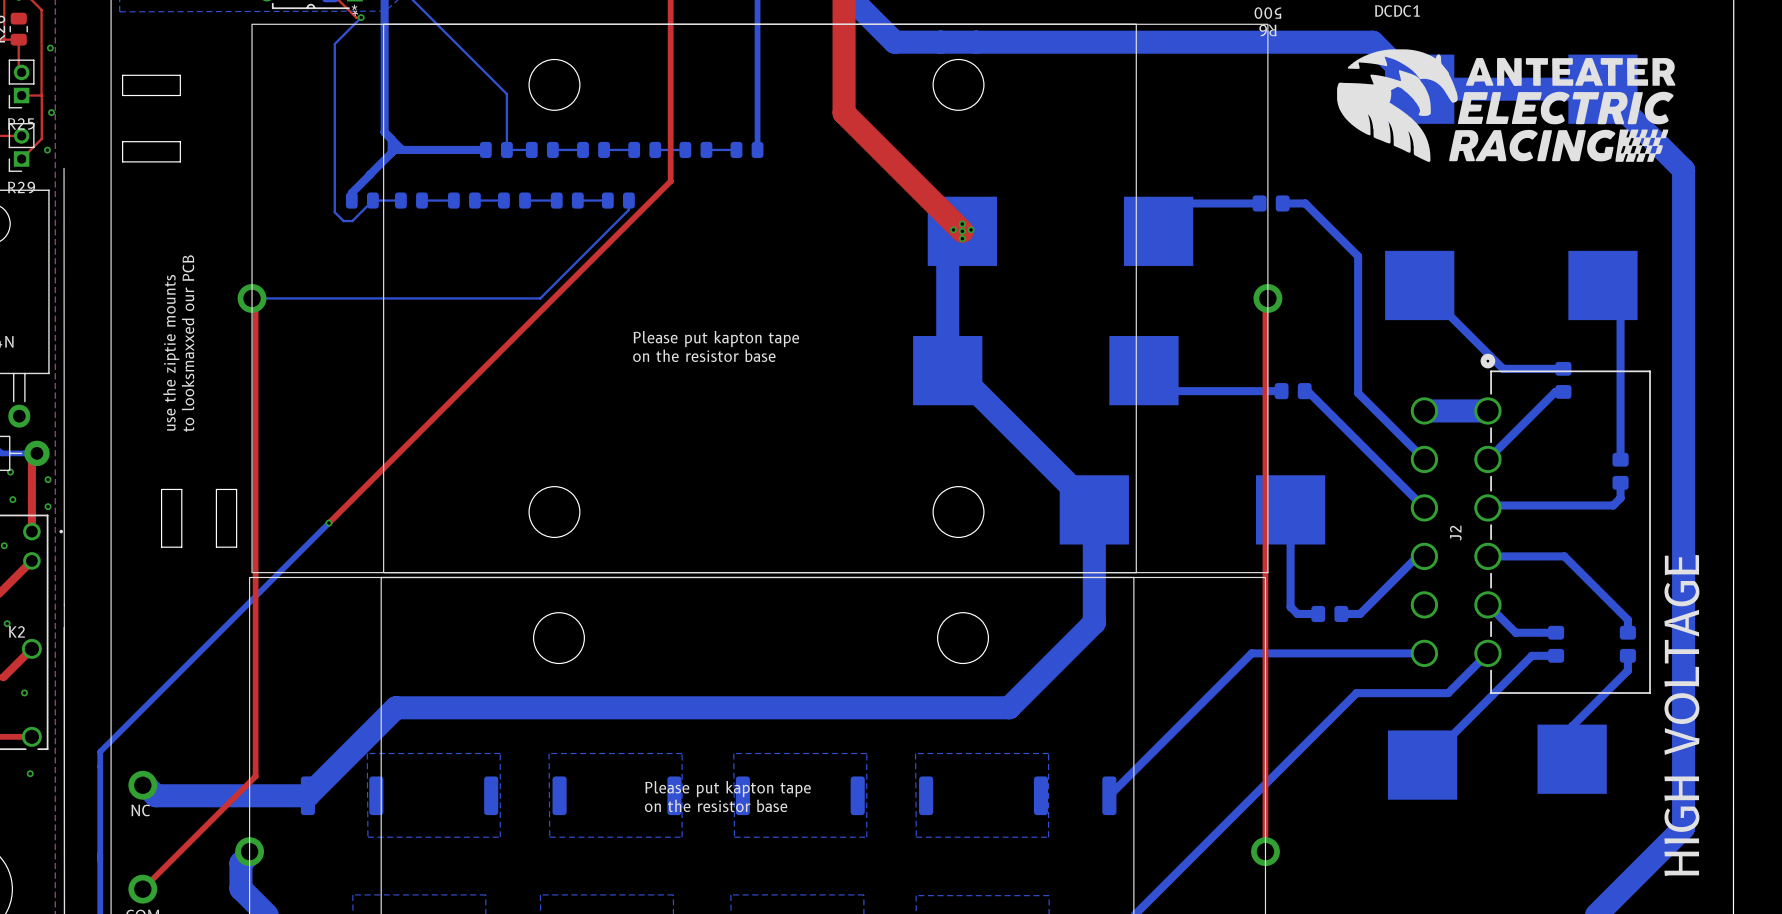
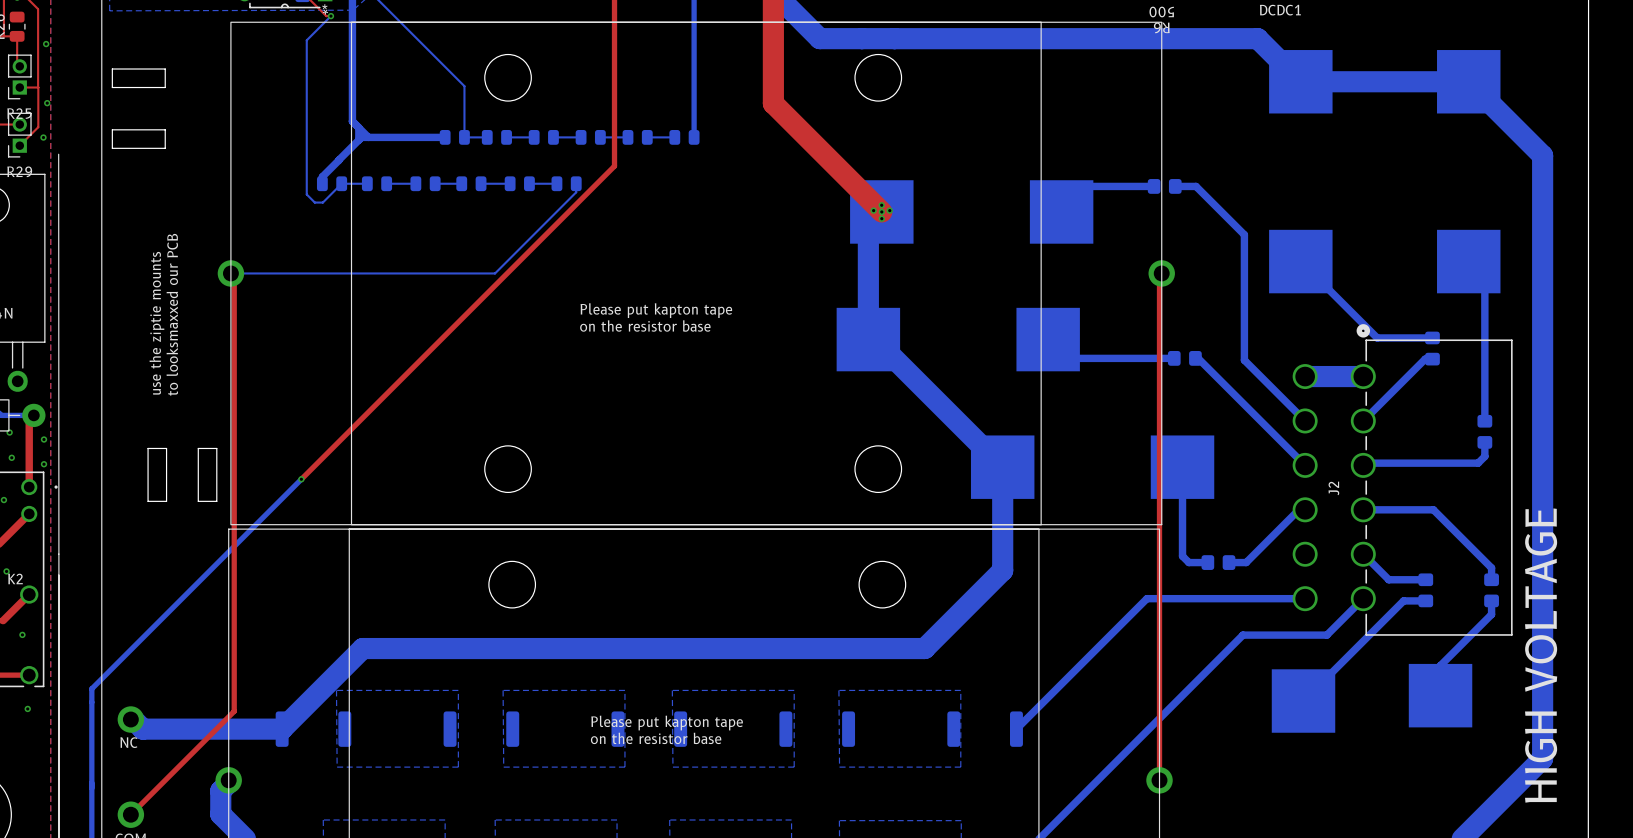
drawing: [1337, 49, 1678, 162] -> none

